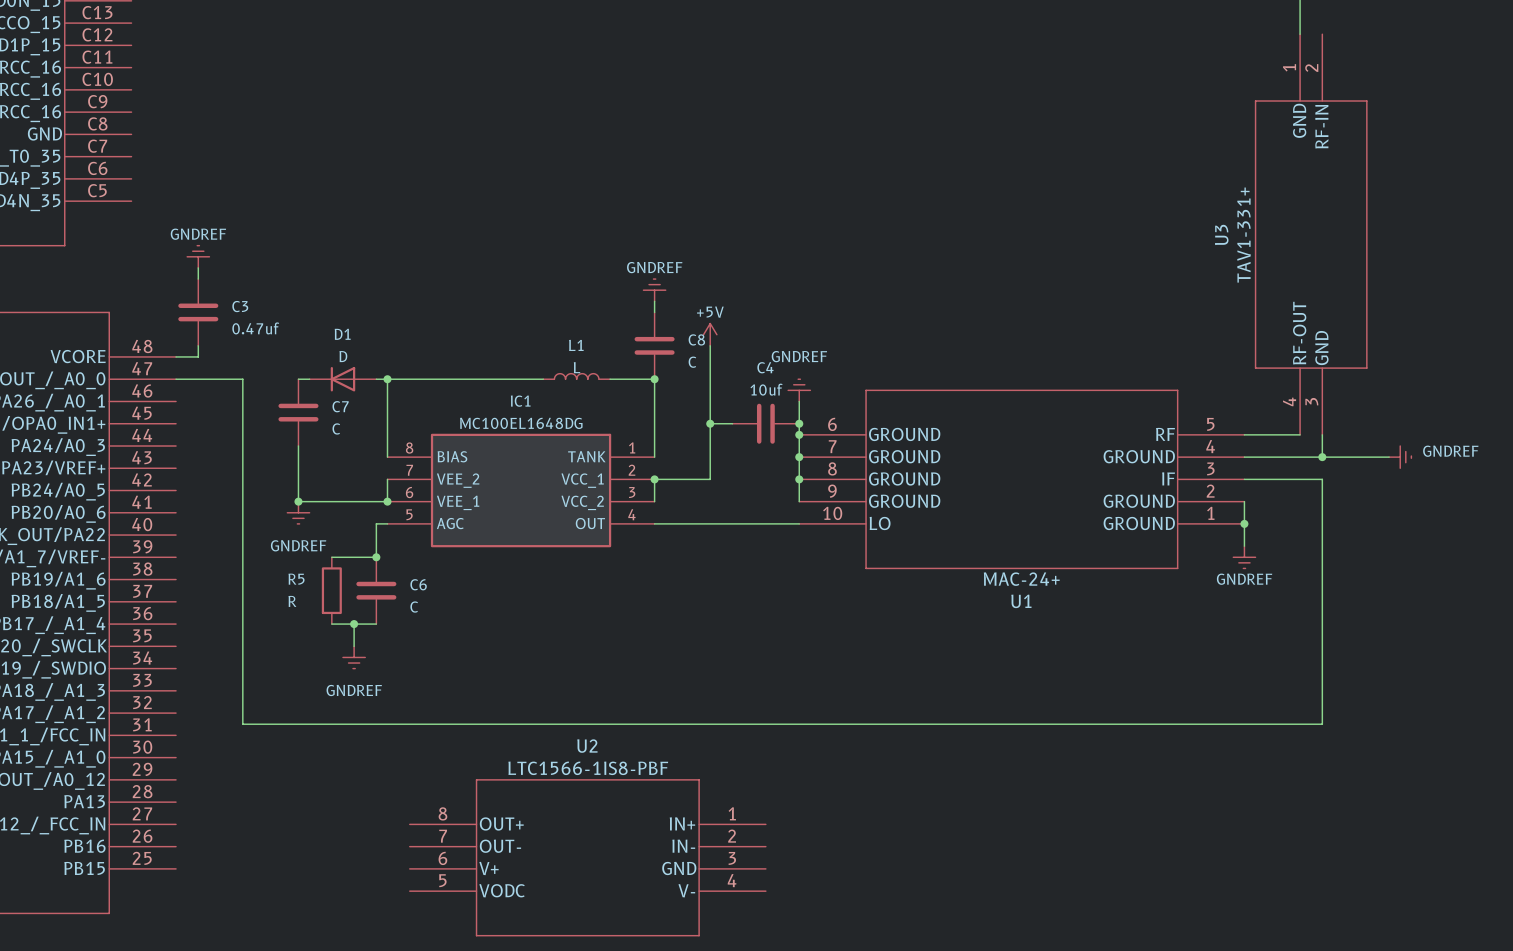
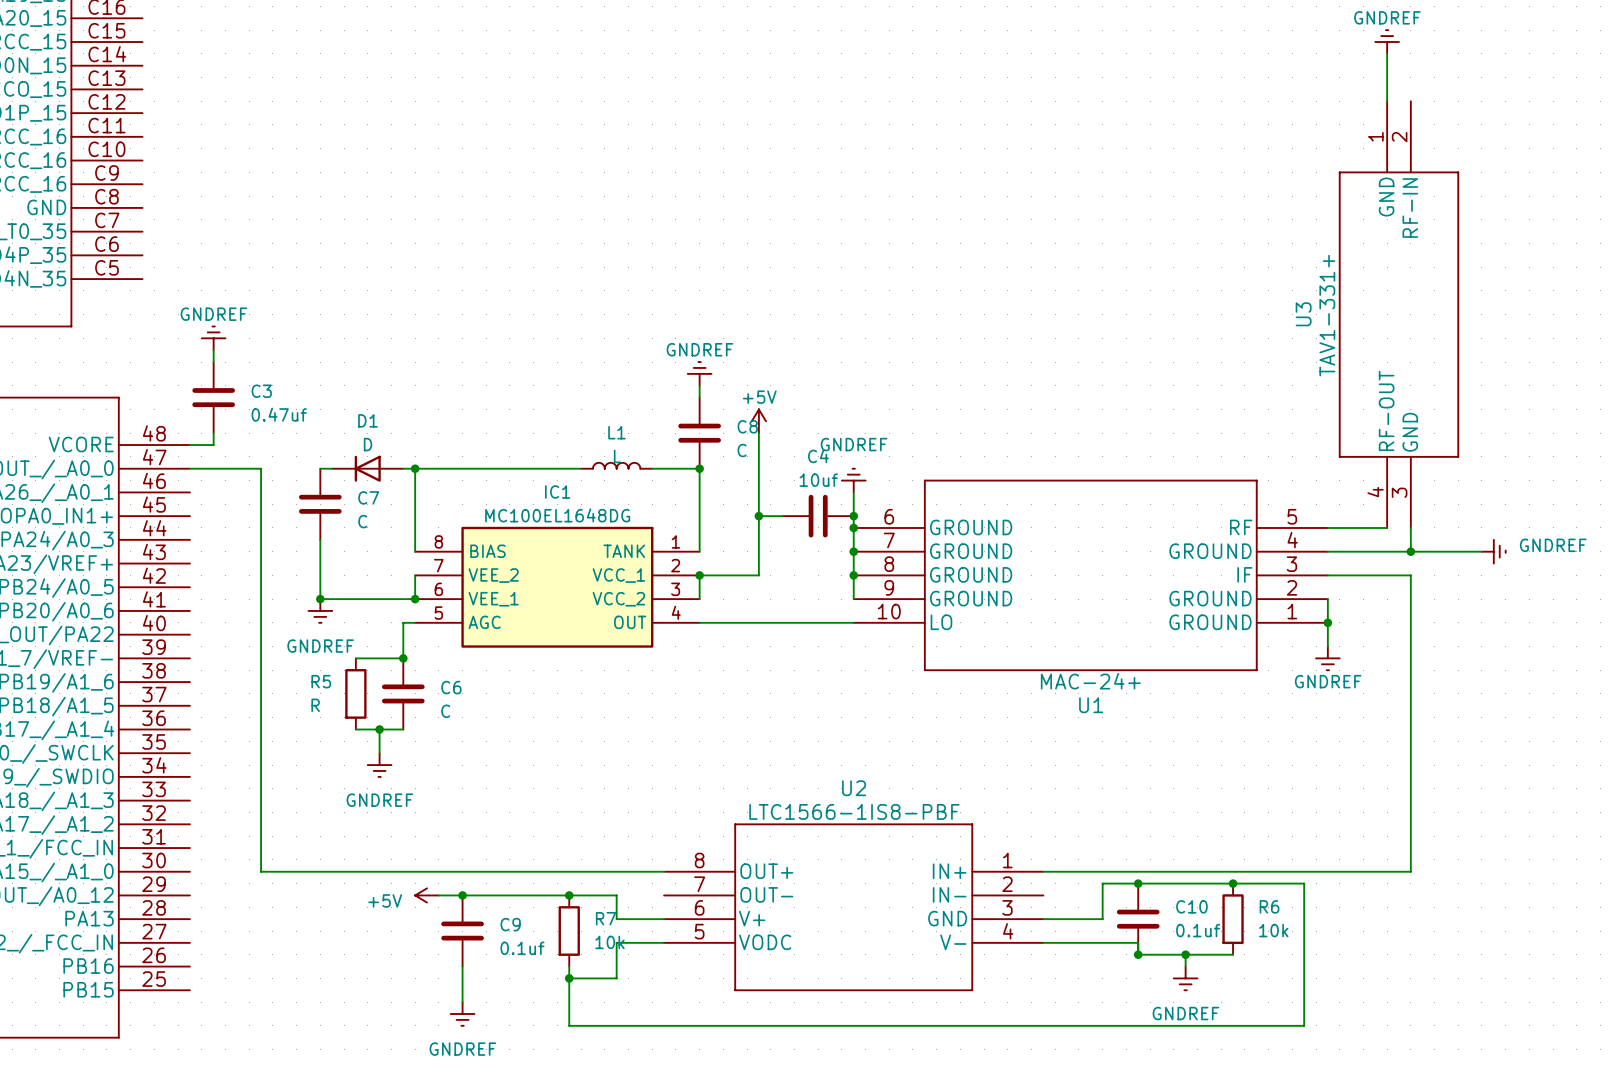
wire: (242, 724) (1322, 724) -> (261, 836) (261, 871) (664, 871)
wire: none -> (1410, 836) (1410, 871) (1043, 871)
junction: none -> (1138, 883)
junction: none -> (1233, 883)
power symbol: none -> +5V (427, 895)
wire: none -> (438, 895) (616, 895) (616, 919) (664, 919)
junction: none -> (462, 895)
junction: none -> (569, 895)
wire: none -> (1043, 919) (1102, 919) (1102, 883) (1304, 883) (1304, 1025) (569, 1025) (569, 966)
C10: none -> 0.1uf (1138, 919)
R6: none -> 10k (1233, 919)
C9: none -> 0.1uf (462, 931)
R7: none -> 10k (569, 931)
wire: none -> (664, 942) (616, 942) (616, 978) (569, 978)
wire: none -> (1043, 942) (1138, 942) (1138, 954) (1233, 954)
junction: none -> (1138, 954)
wire: none -> (1185, 954) (1185, 966)
junction: none -> (1185, 954)
wire: none -> (462, 966) (462, 1002)
junction: none -> (569, 978)
U2 position: (587, 857) -> (853, 907)
power symbol: none -> GNDREF (1185, 978)
power symbol: none -> GNDREF (462, 1013)

